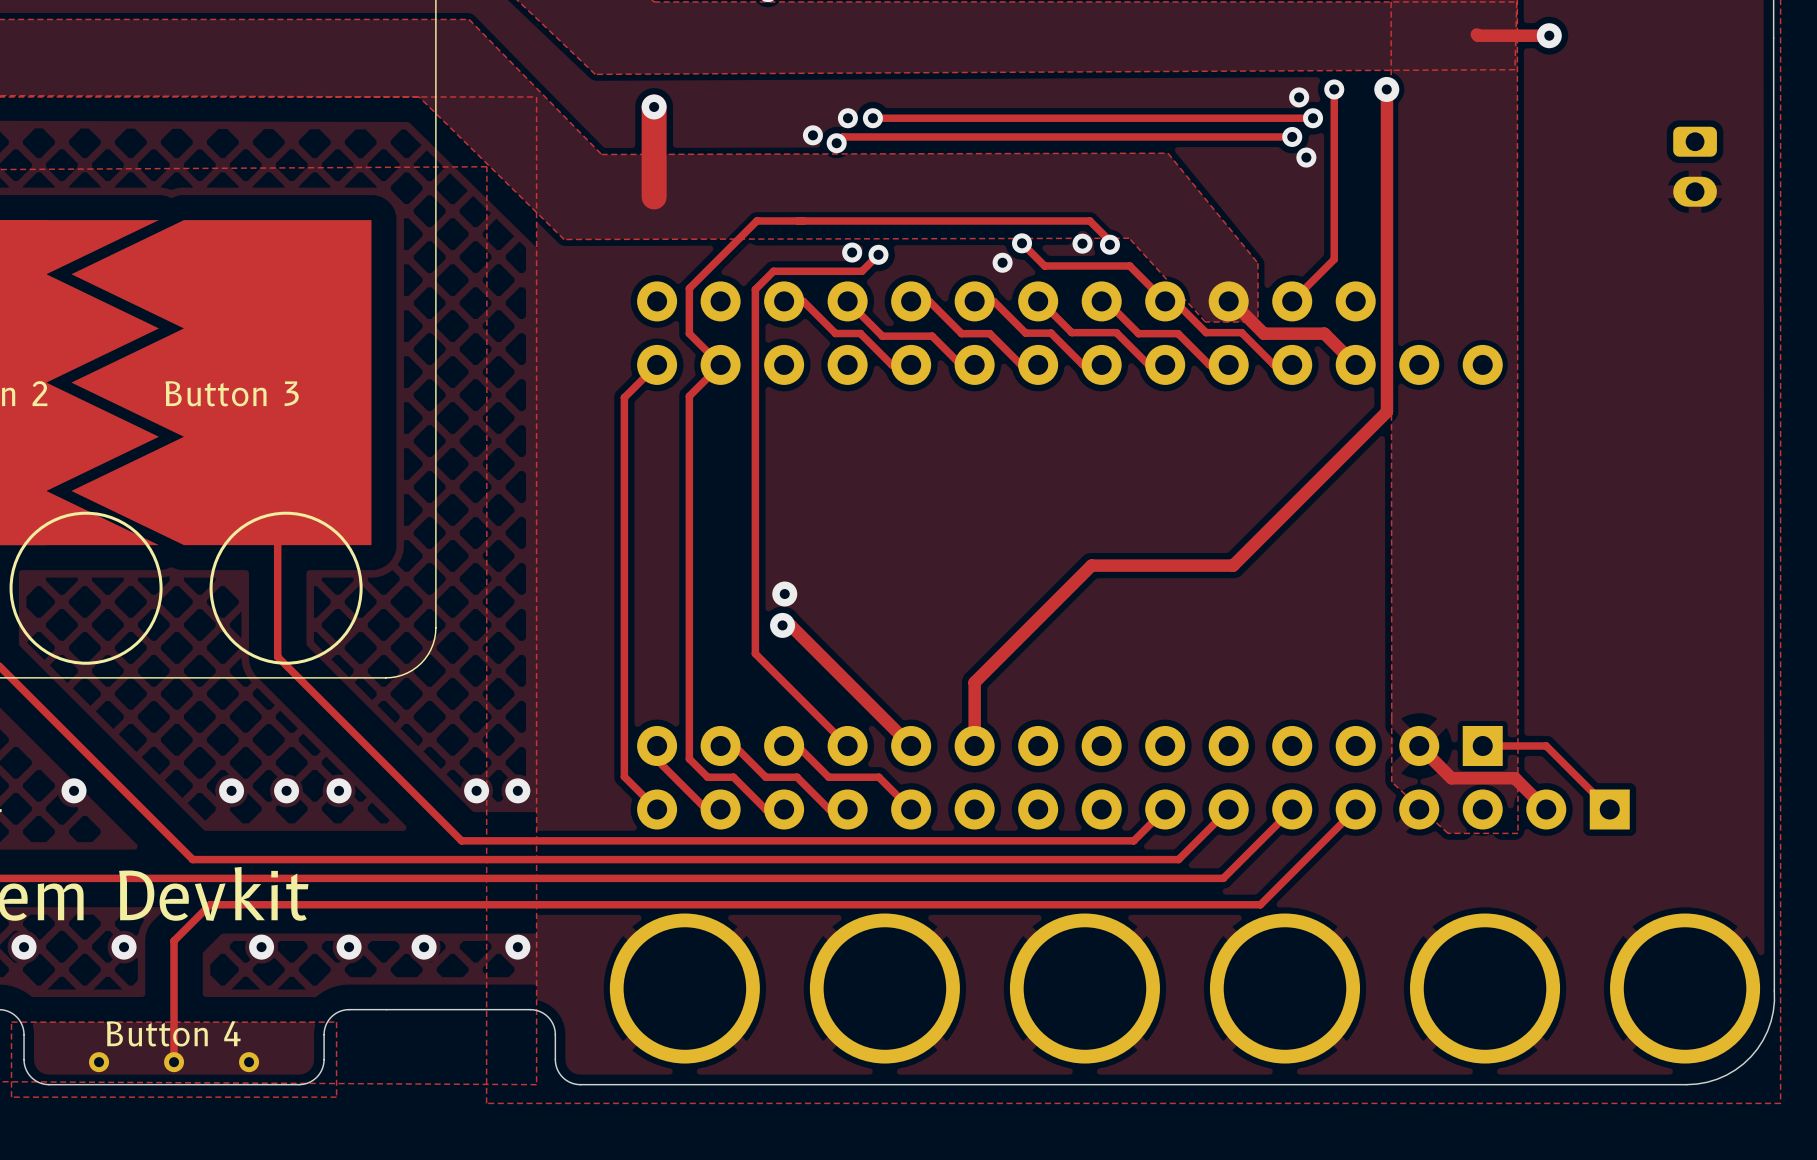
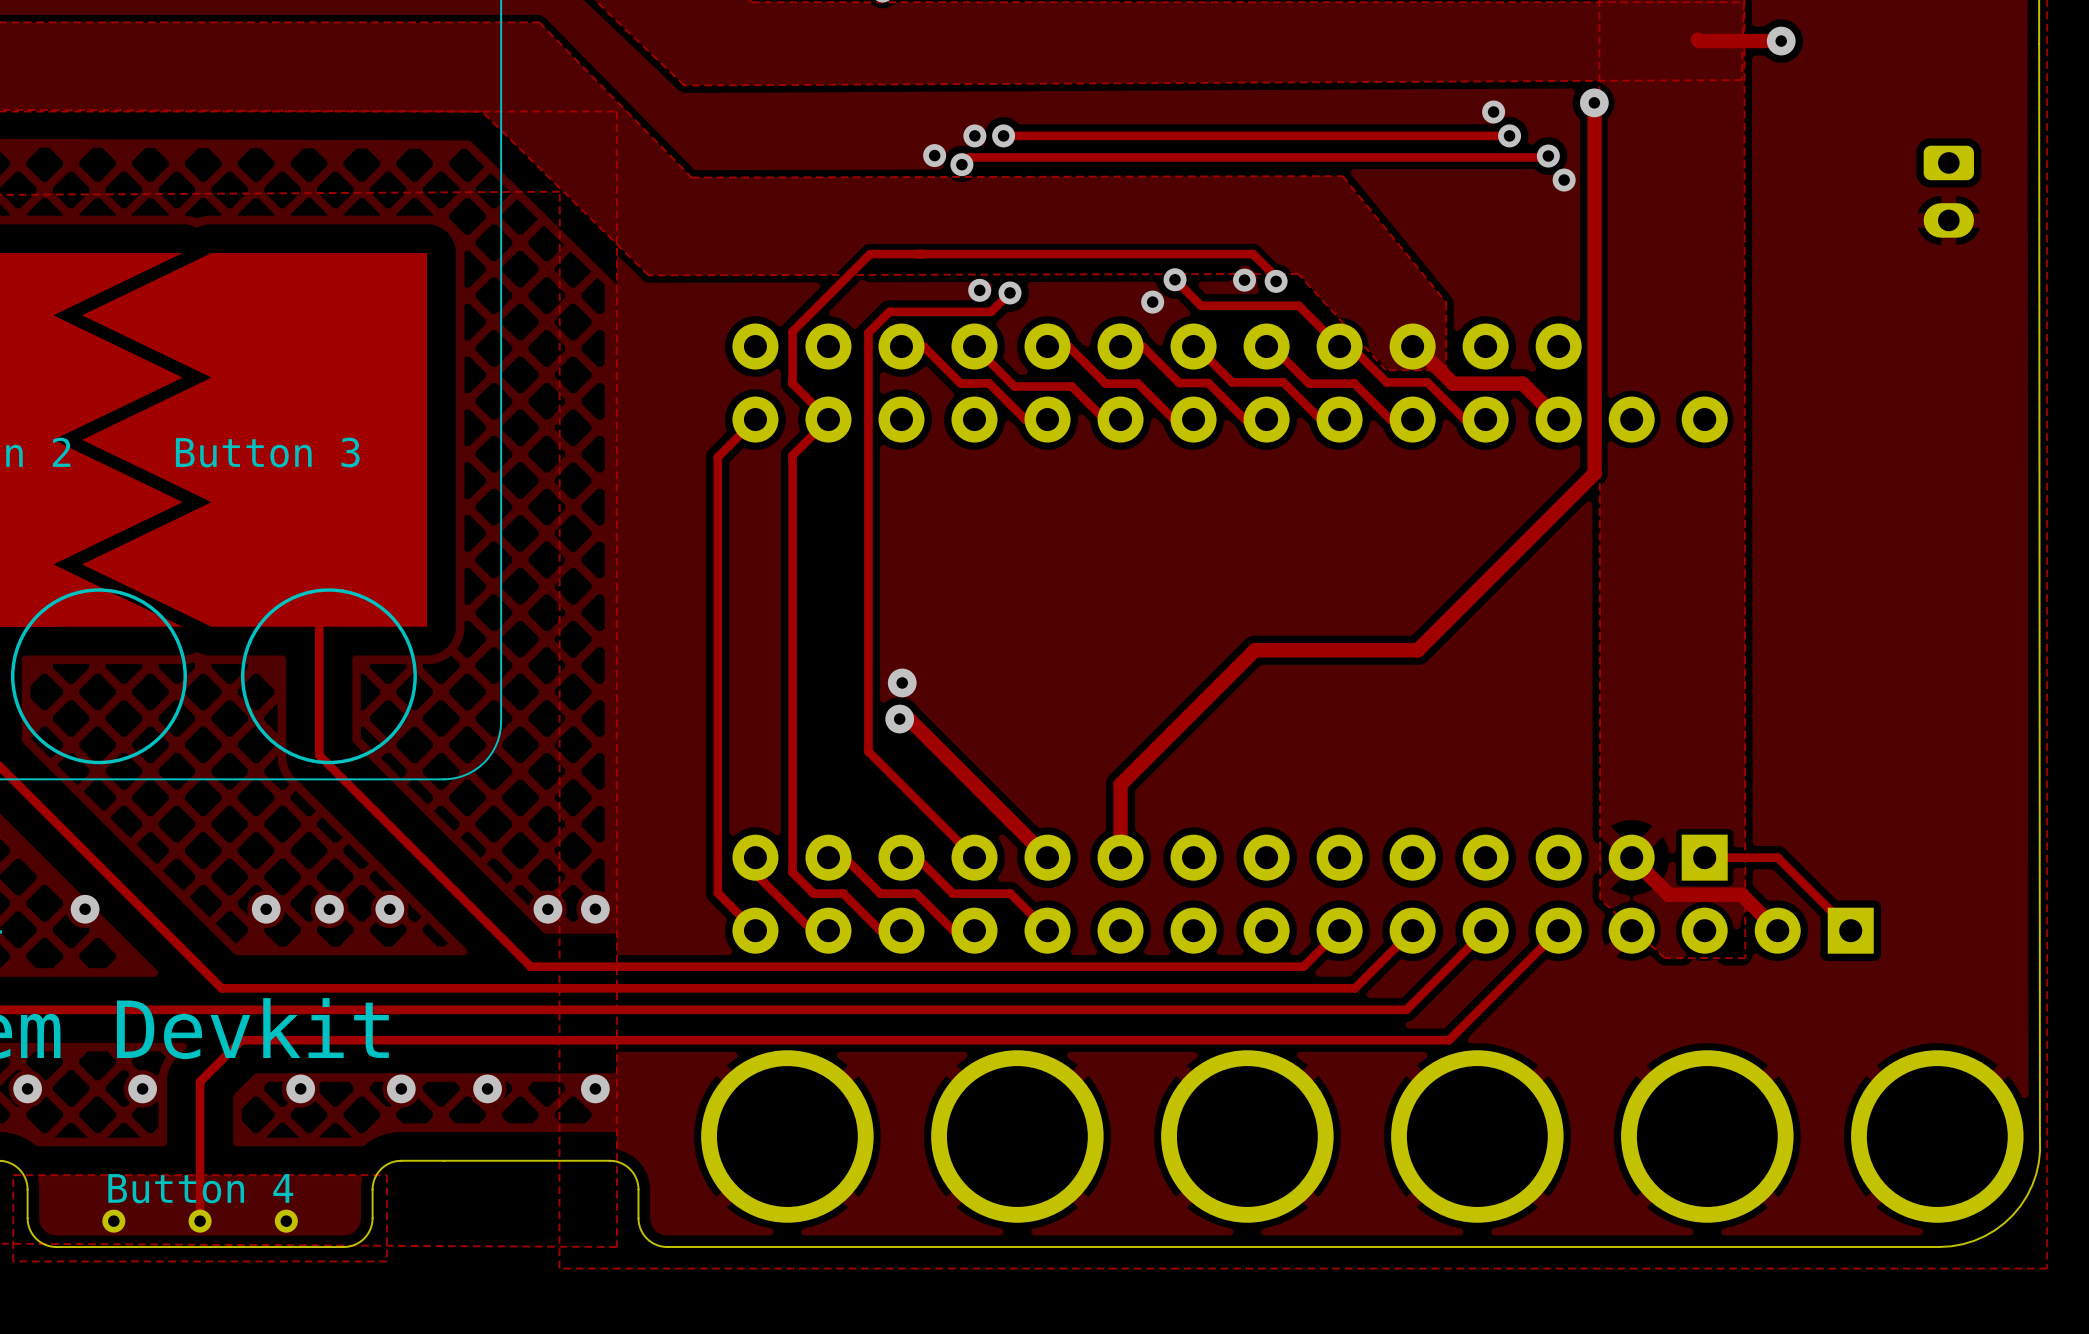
track: (1334, 89) (1334, 259) (1292, 301) -> none
via: (1334, 89) -> none
track: (654, 106) (654, 196) -> none
via: (654, 106) -> none
track: none -> (1548, 156) (1485, 157)
via: none -> (1548, 156)
via: (1292, 136) -> none
via: none -> (1564, 180)
via: (1306, 157) -> none

